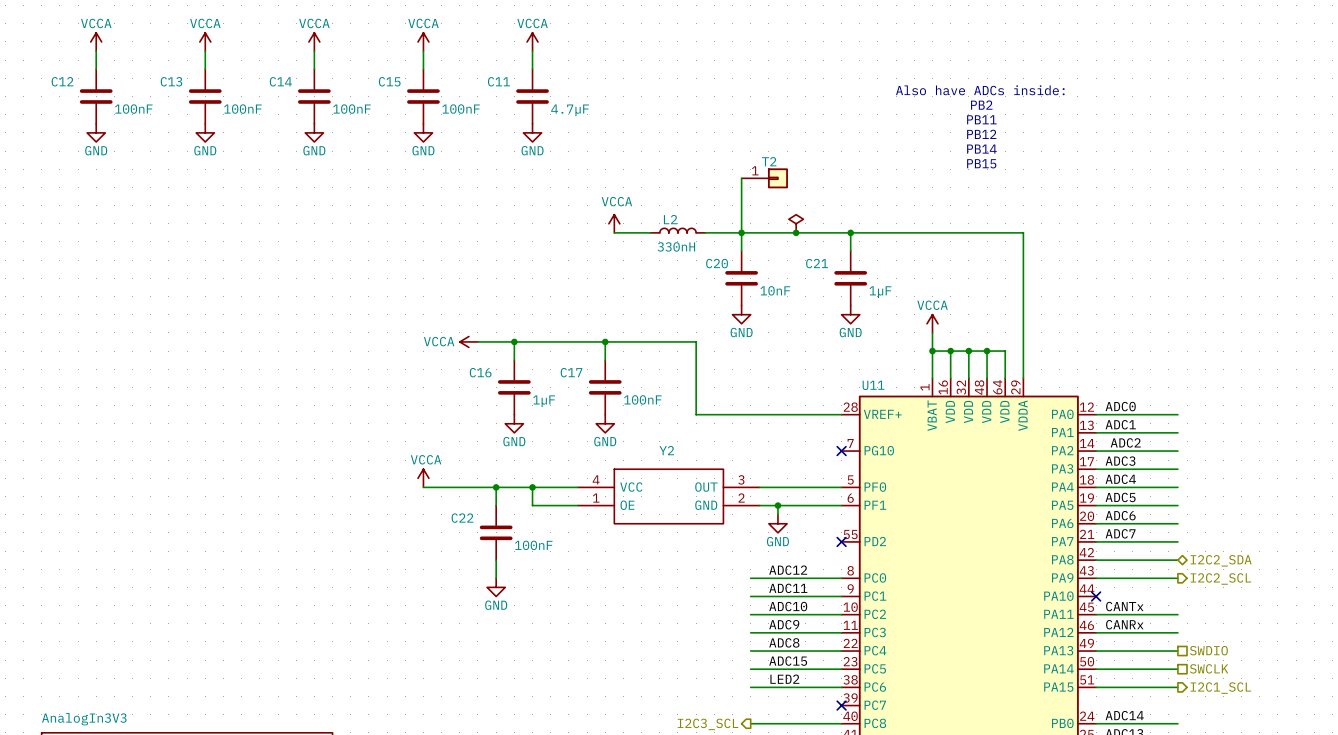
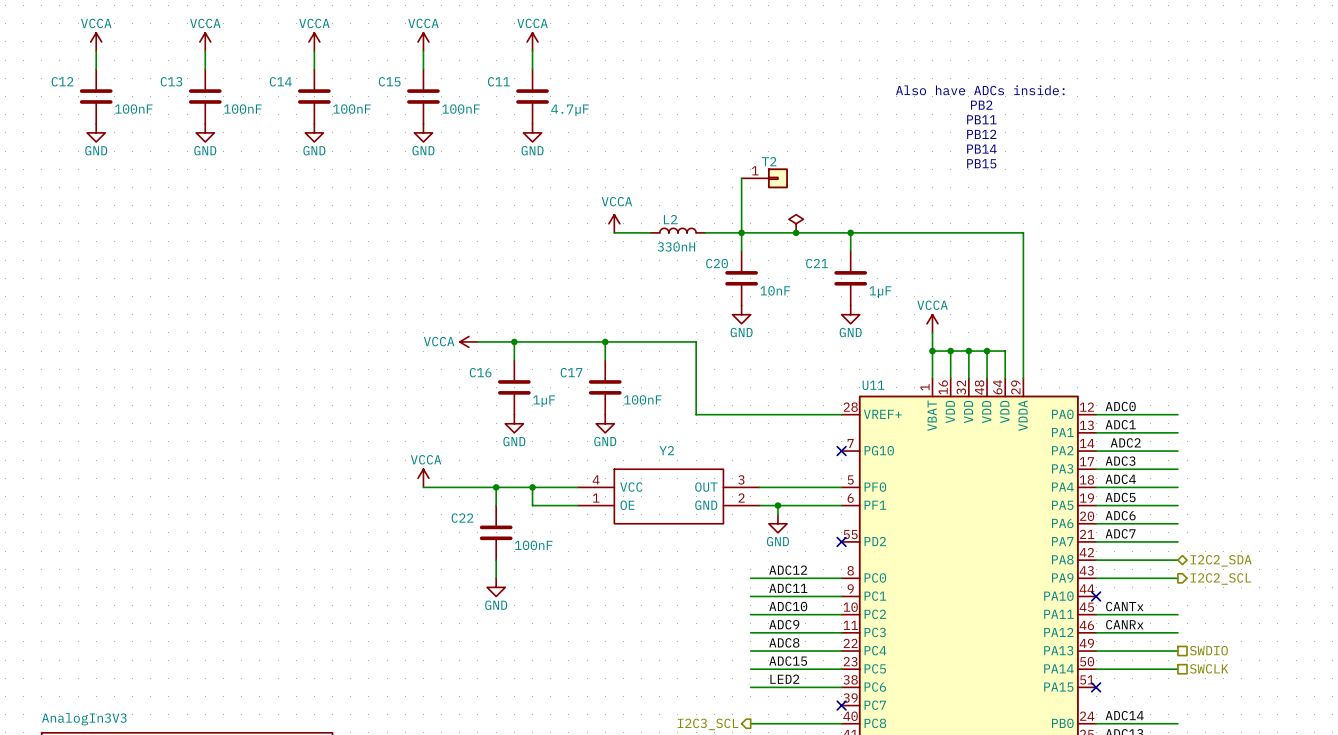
wire: (1096, 687) (1177, 687) -> none
no-connect mark: none -> (1096, 687)
hierarchical label: I2C1_SCL (1220, 688) -> none

